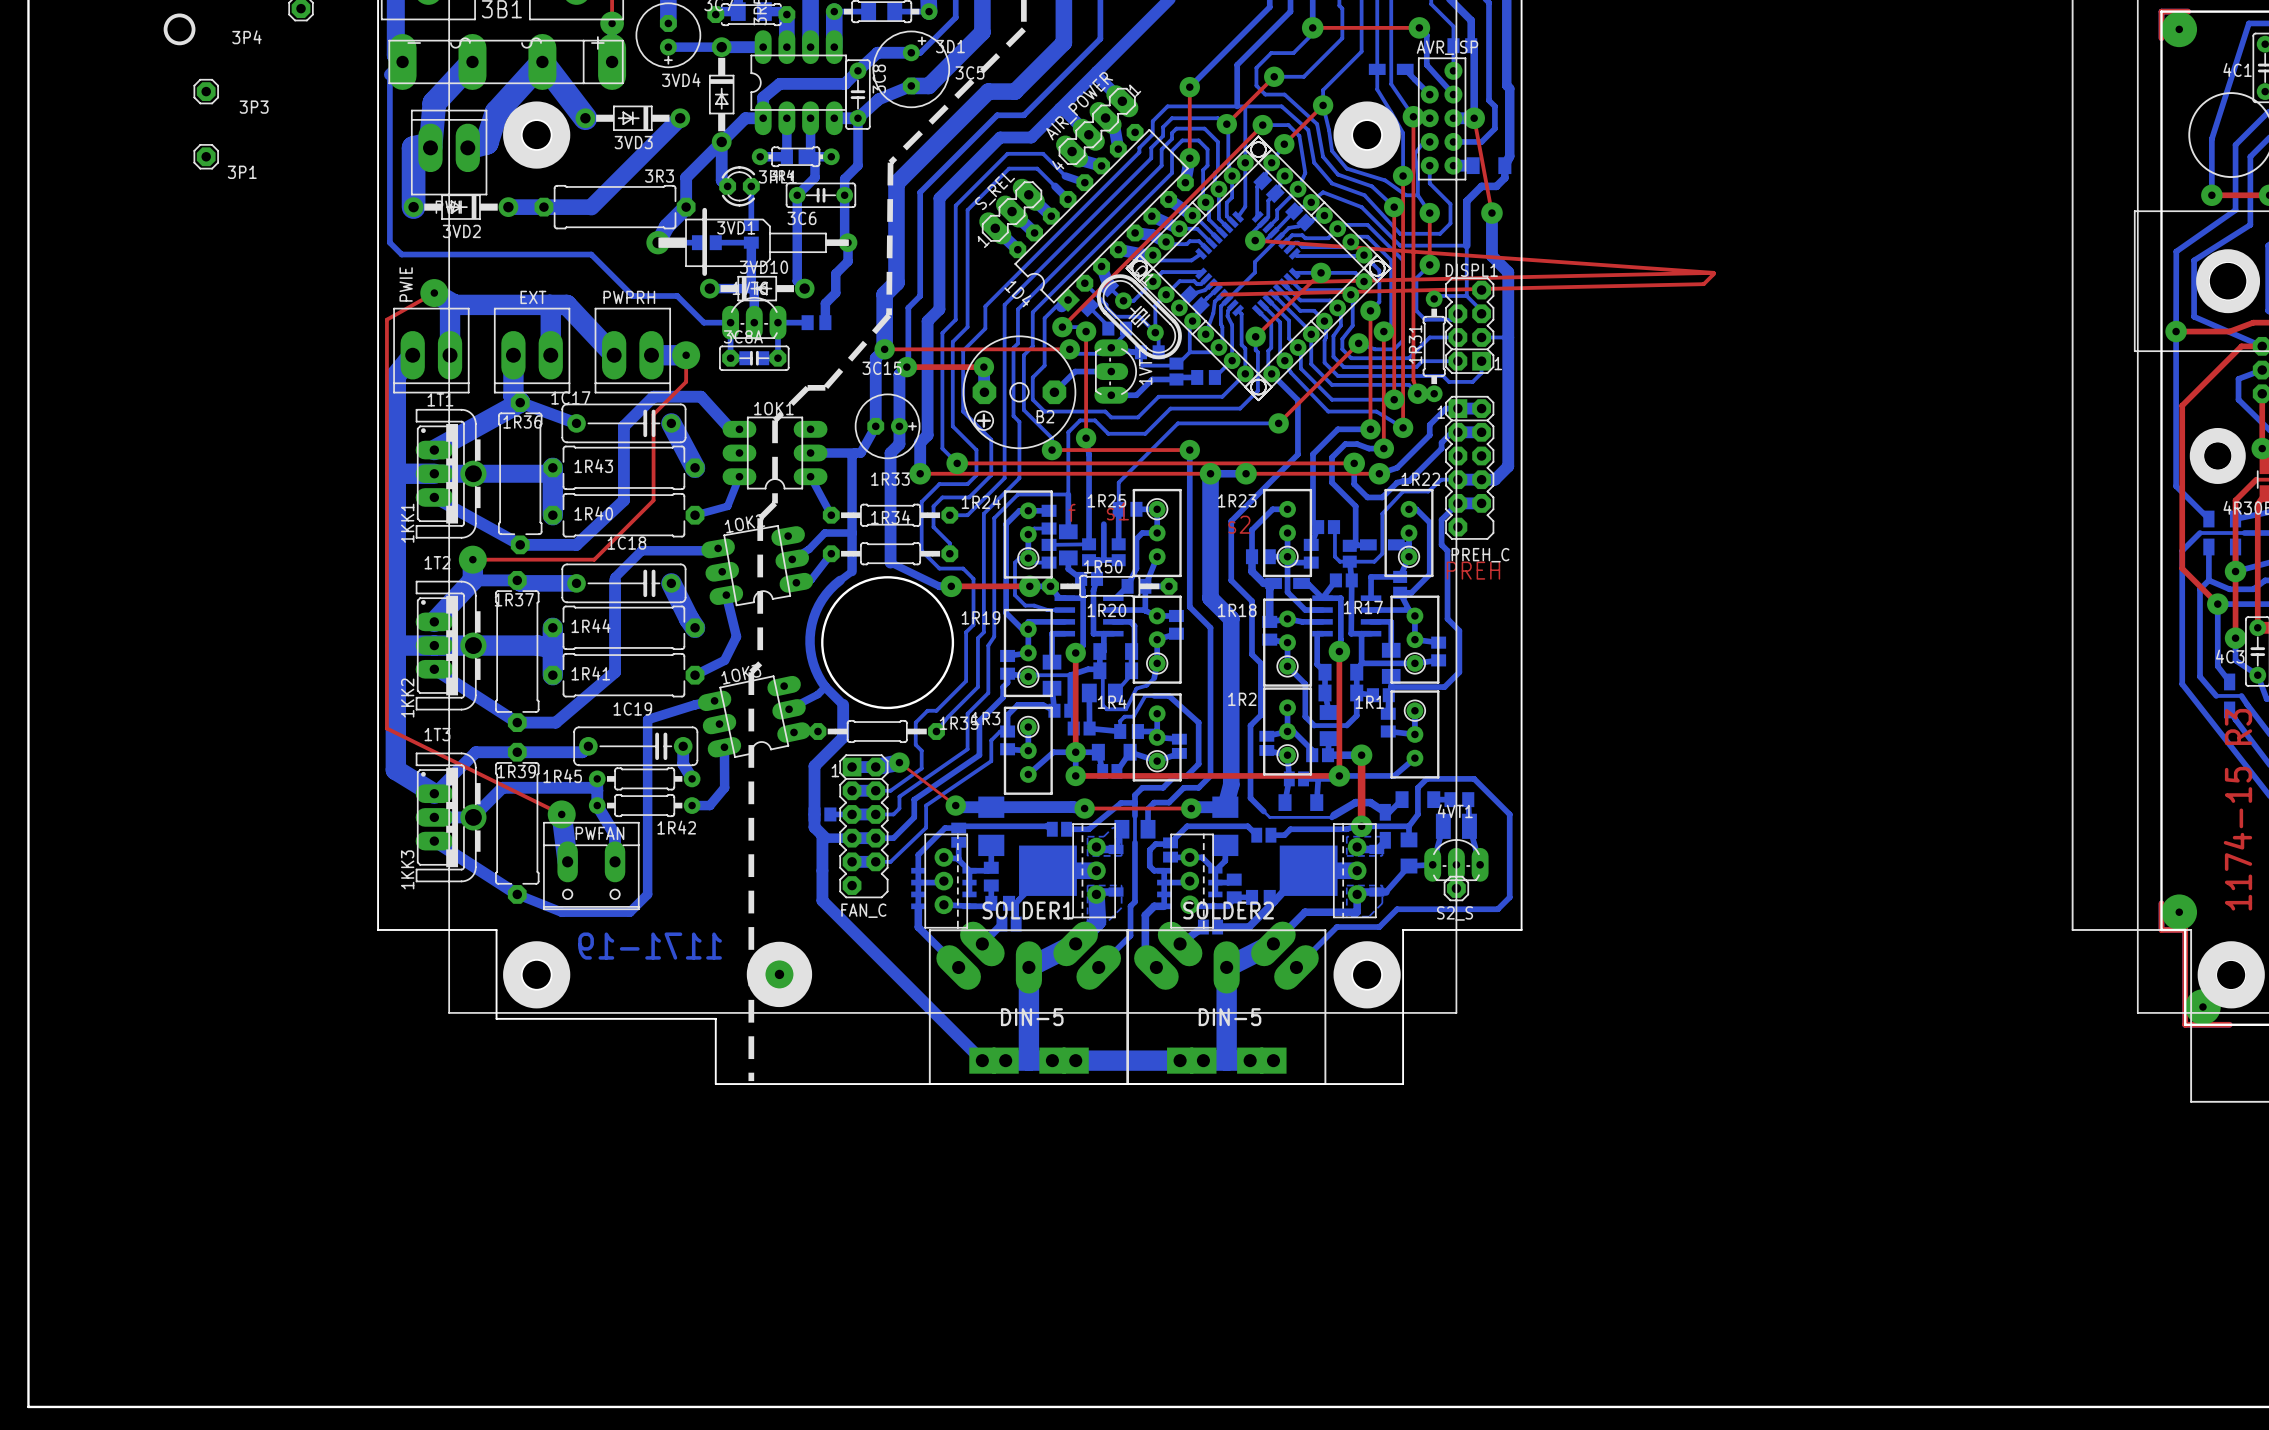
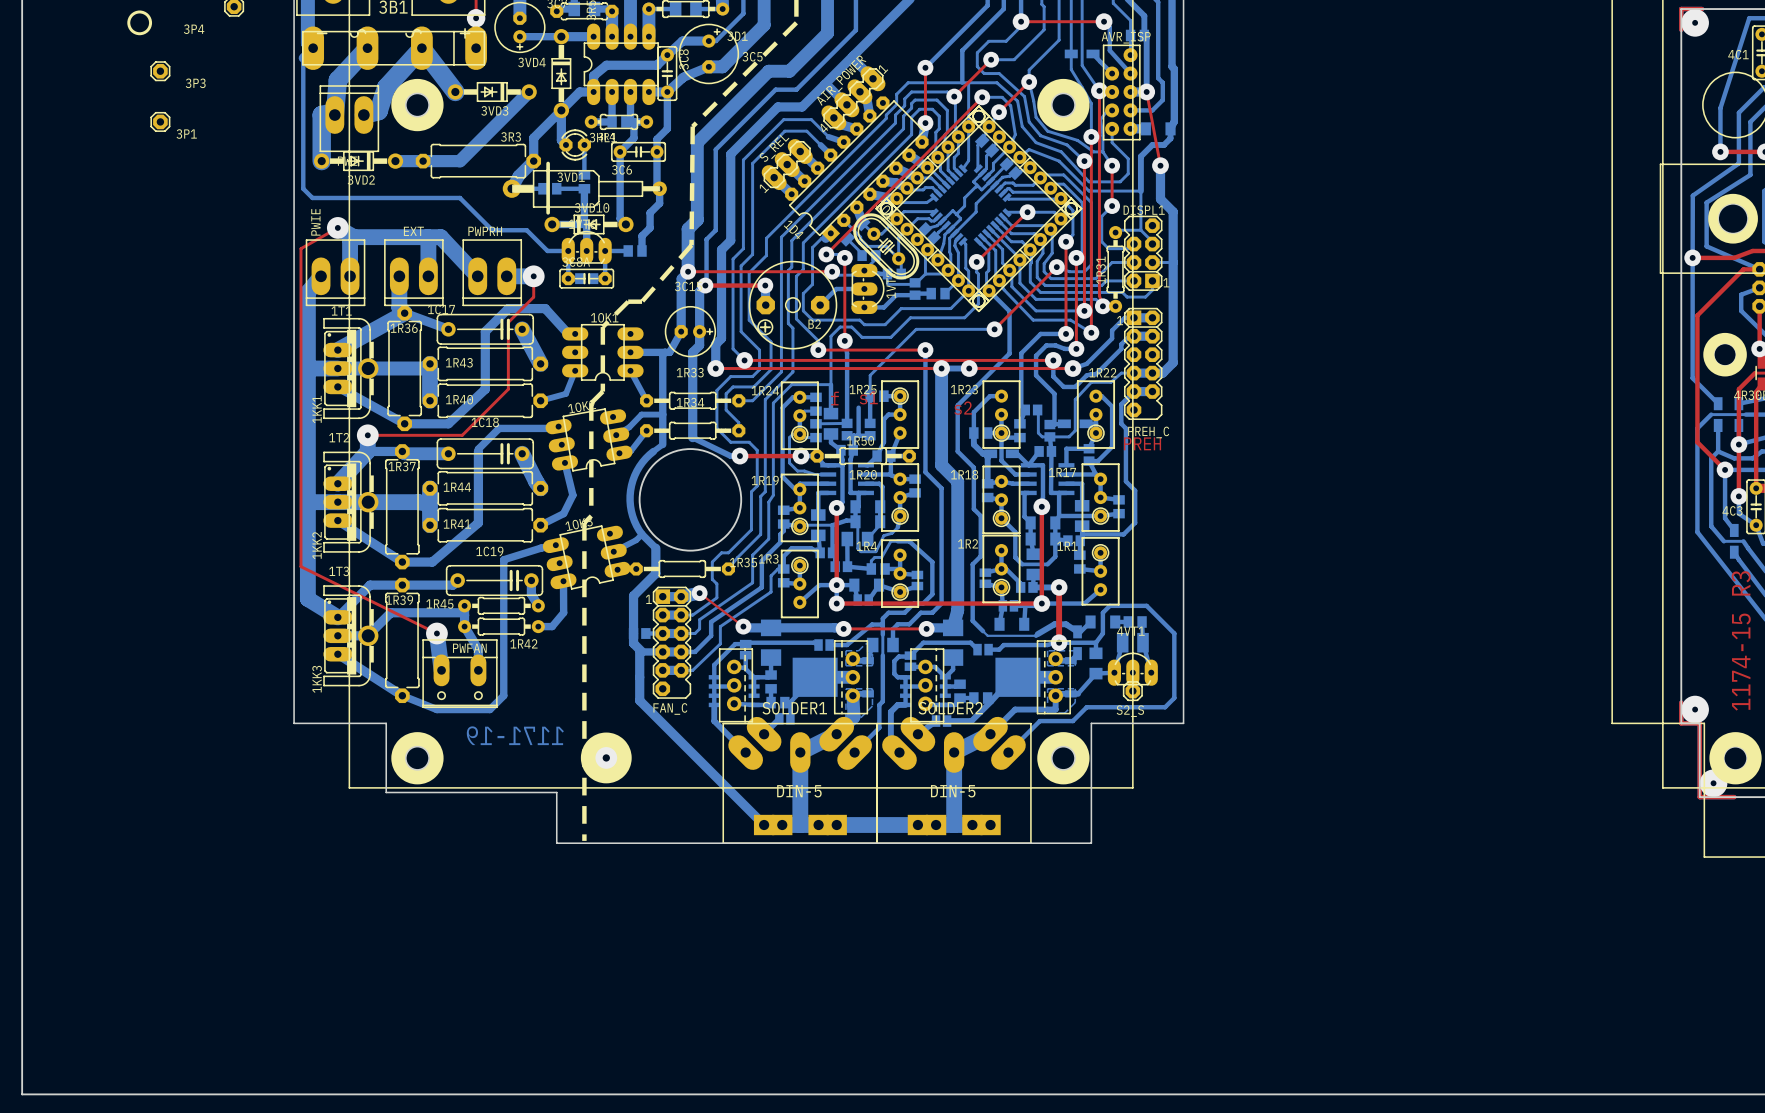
bottom track: none -> (976, 184) (964, 197) (964, 206) (956, 214)
top track: (1255, 240) (1713, 272) -> none
via: (1255, 240) -> none
top track: (1713, 272) (1211, 284) -> none
top track: (1713, 272) (1703, 284) (1222, 294) -> none
bottom track: none -> (942, 220) (952, 210) (960, 219) (950, 229)

